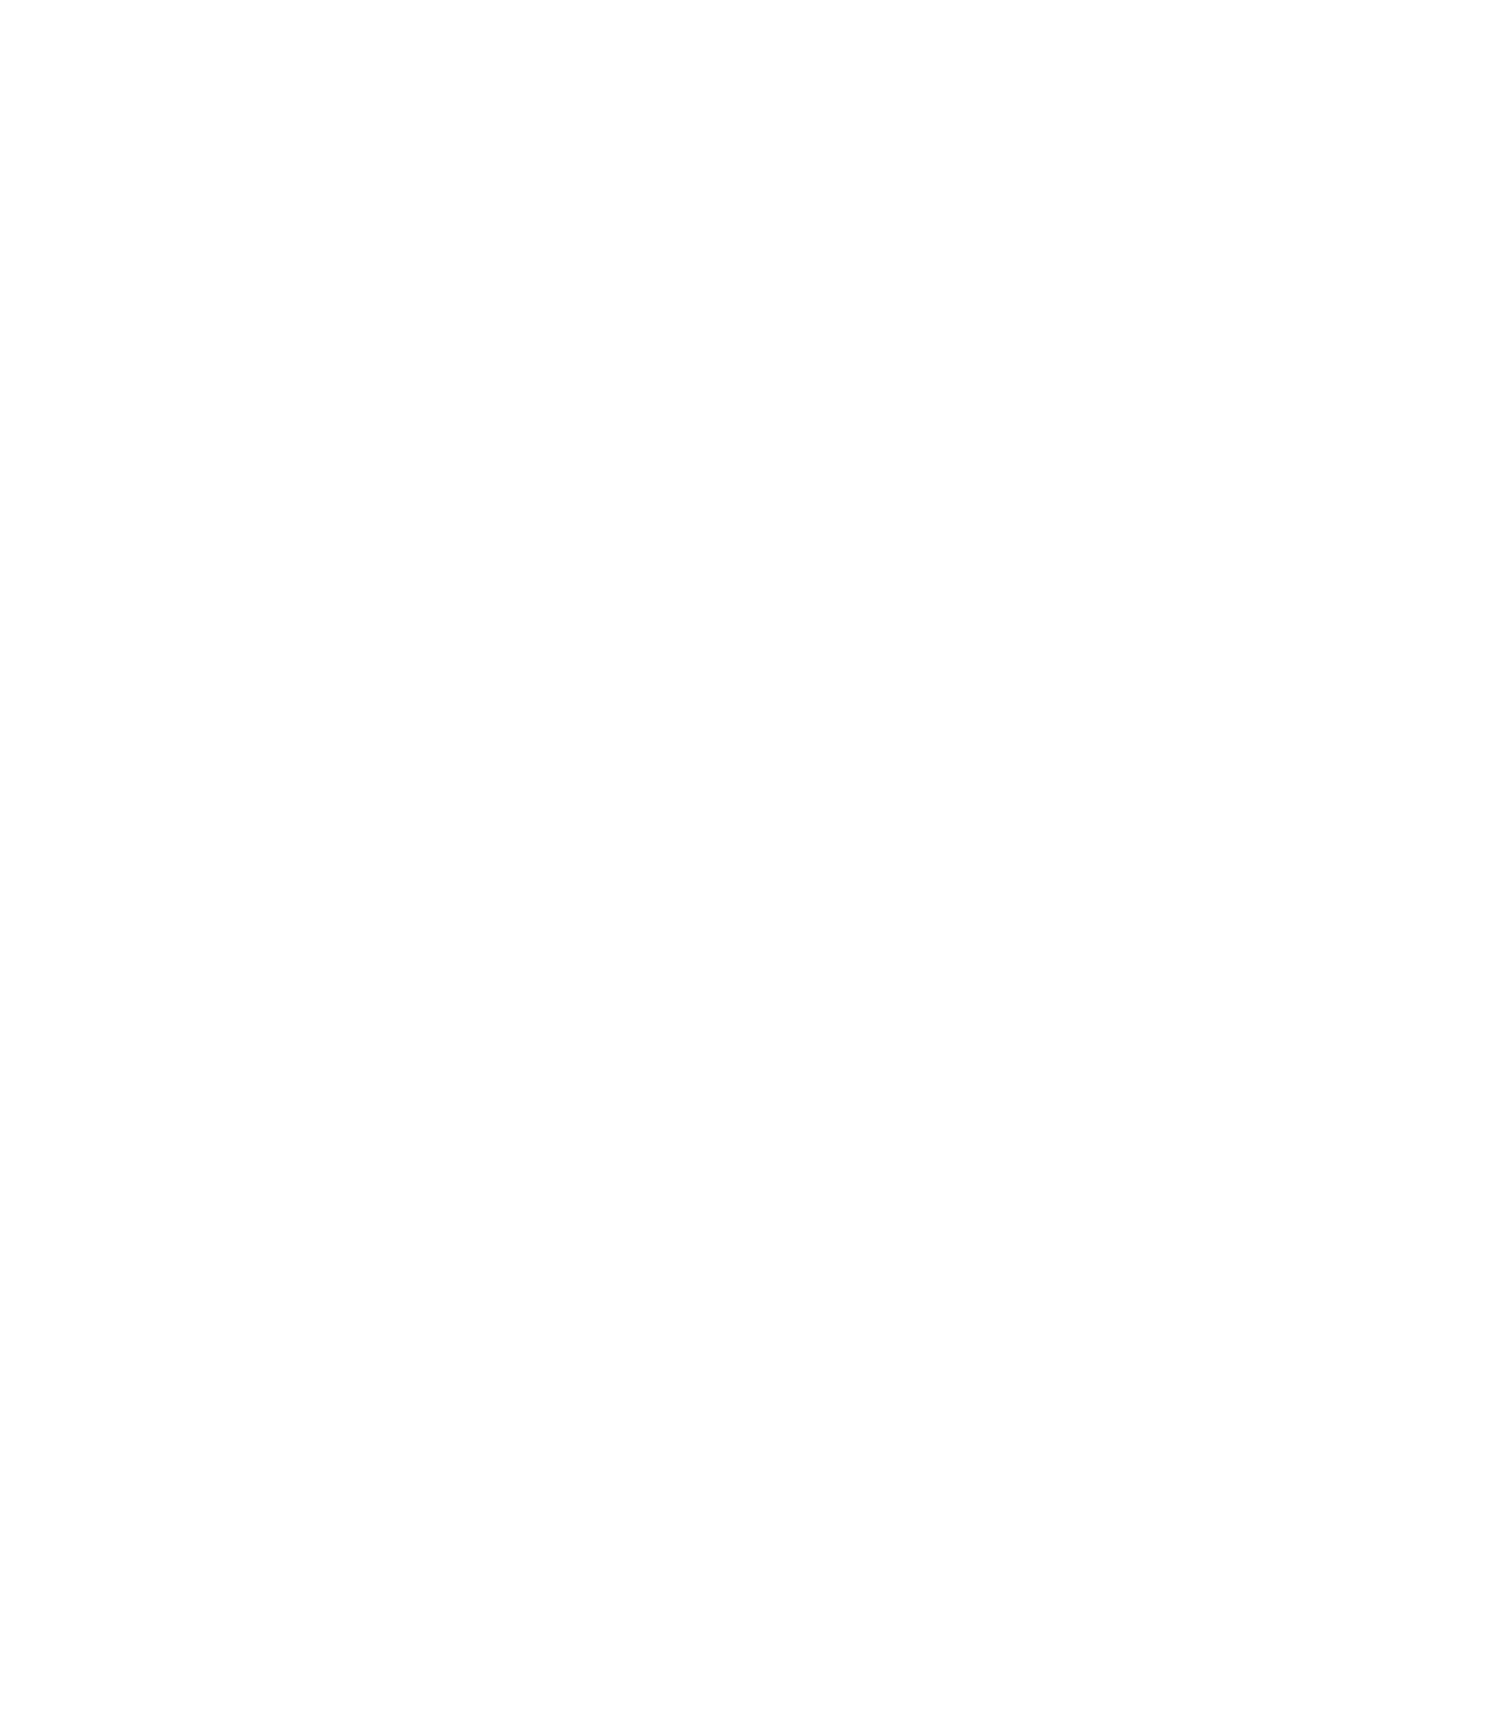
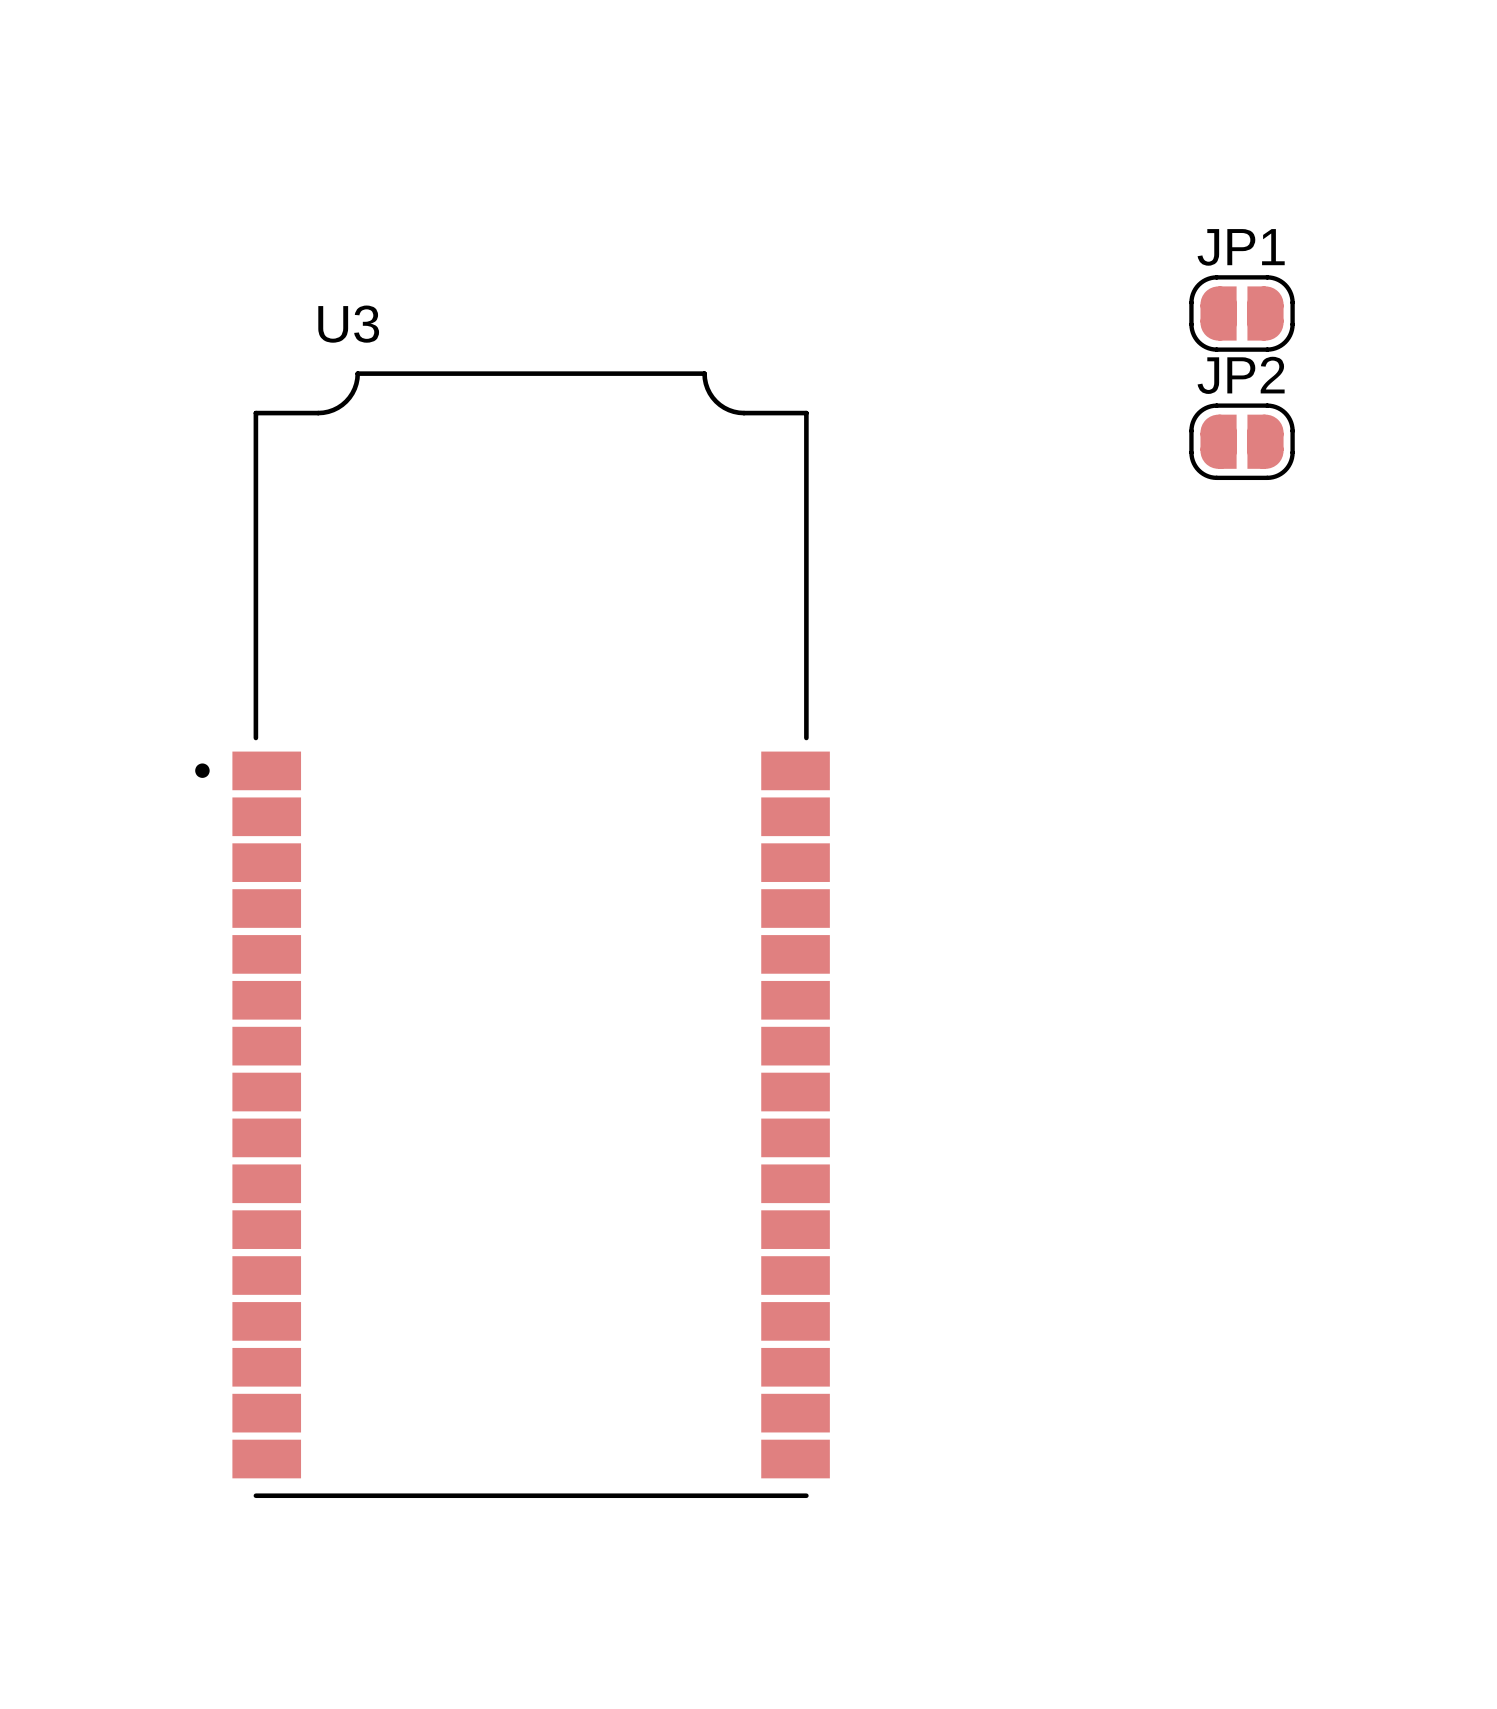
JP1: none -> (1242, 313)
JP2: none -> (1242, 441)
U3: none -> (512, 934)

